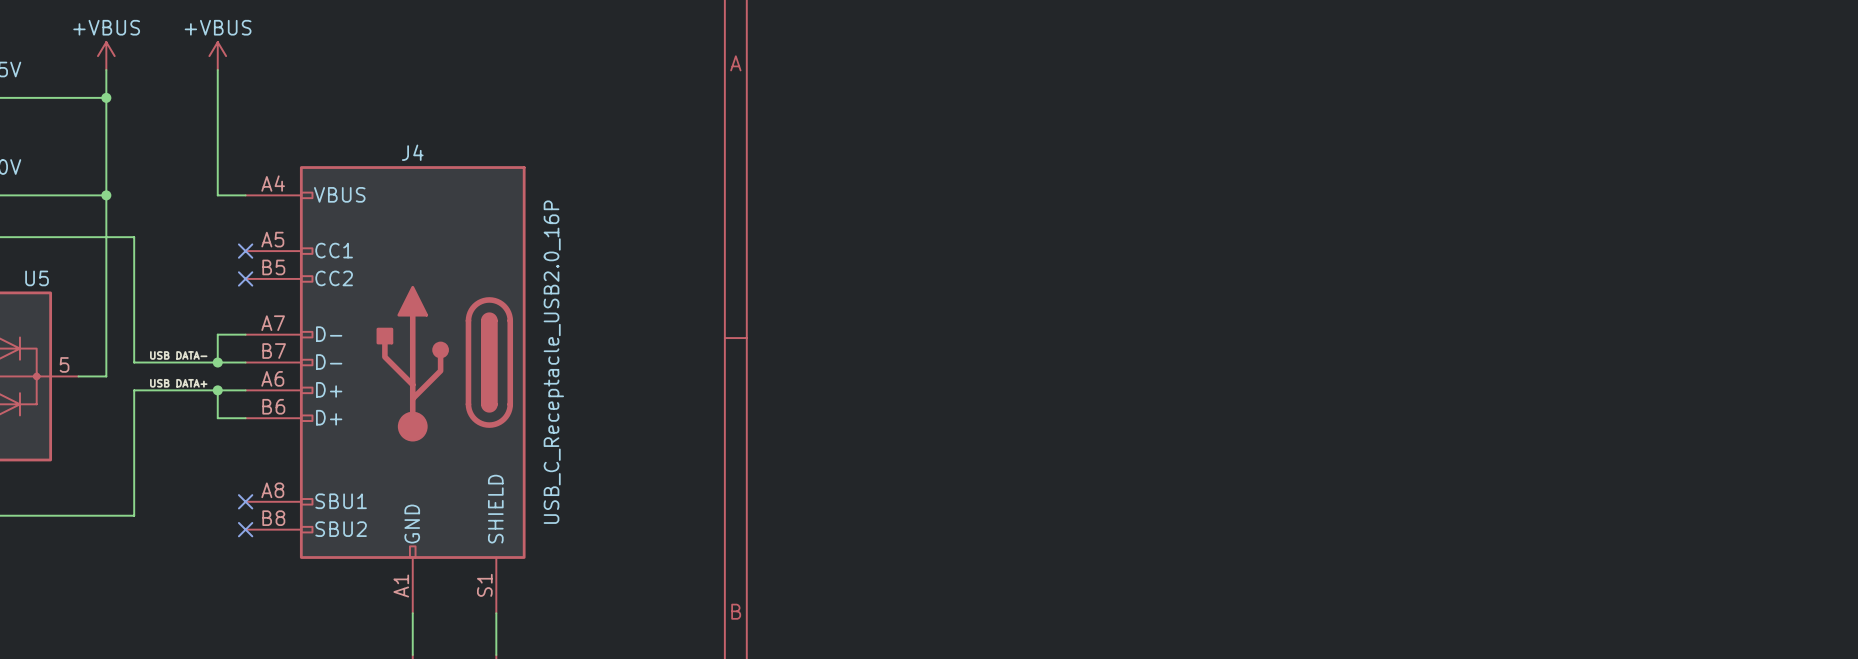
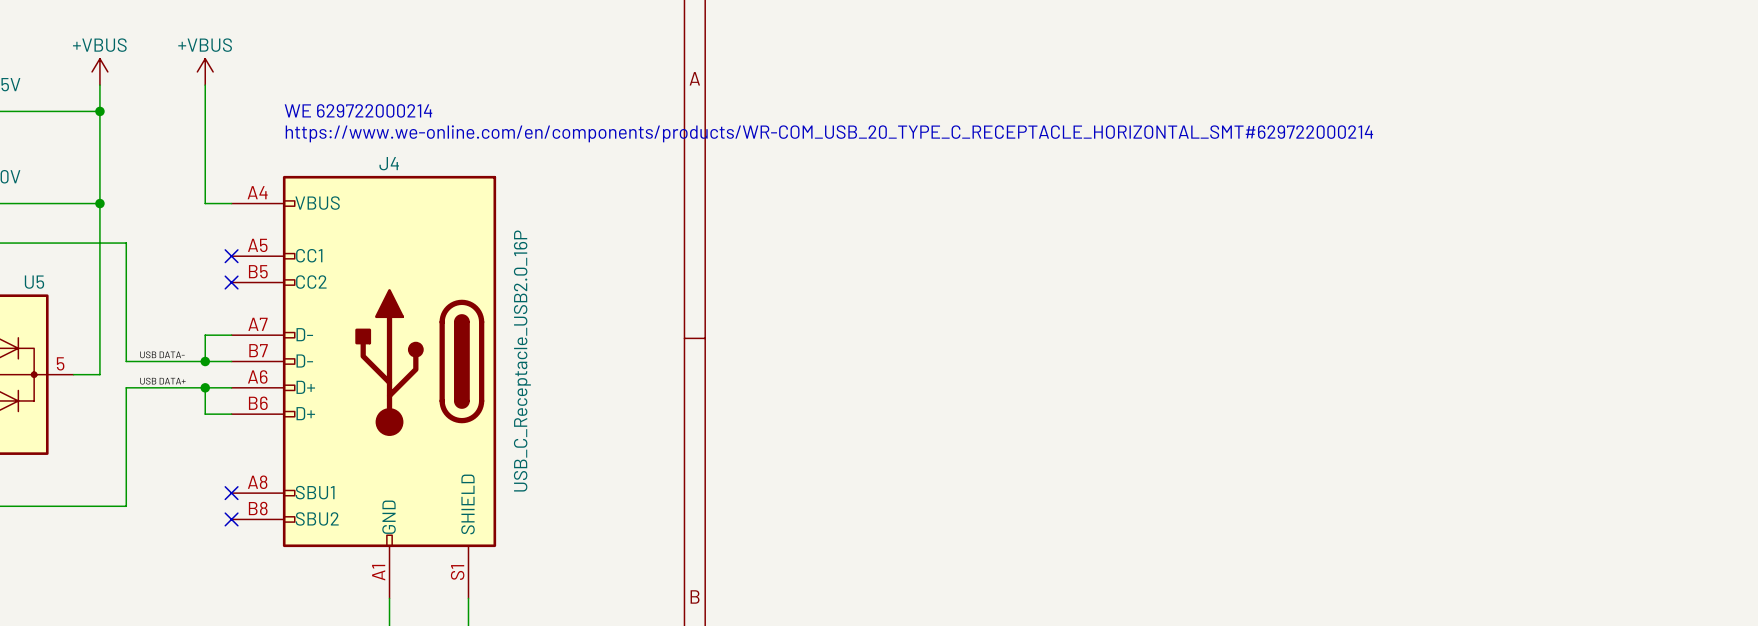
text: none -> WE 629722000214 (358, 110)
text: none -> https://www.we-online.com/en/components/products/WR-COM_USB_20_TYPE_C_RECEPTACLE_HORIZONTAL_SMT#629722000214 (829, 133)

